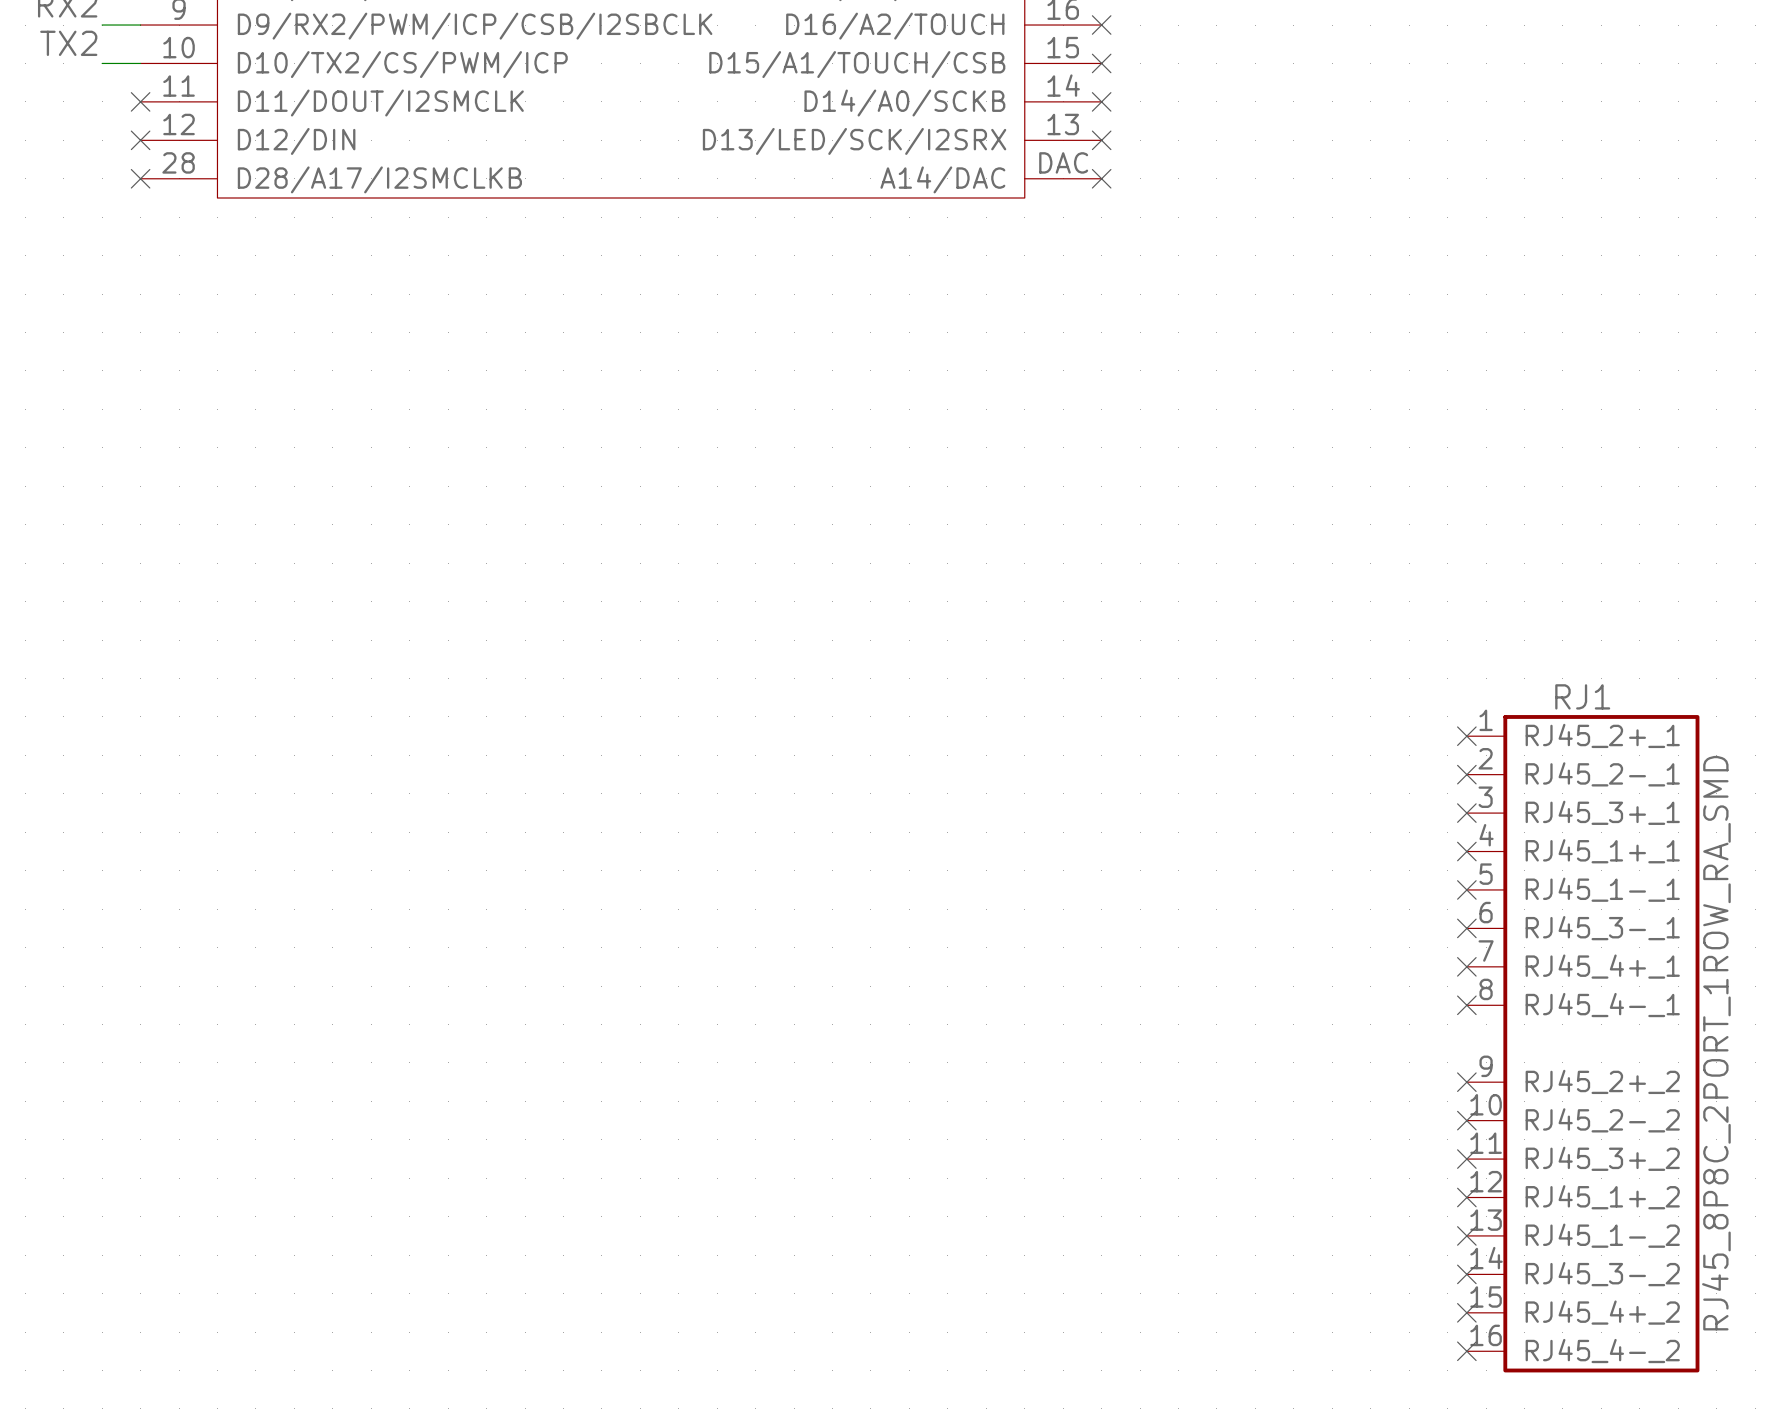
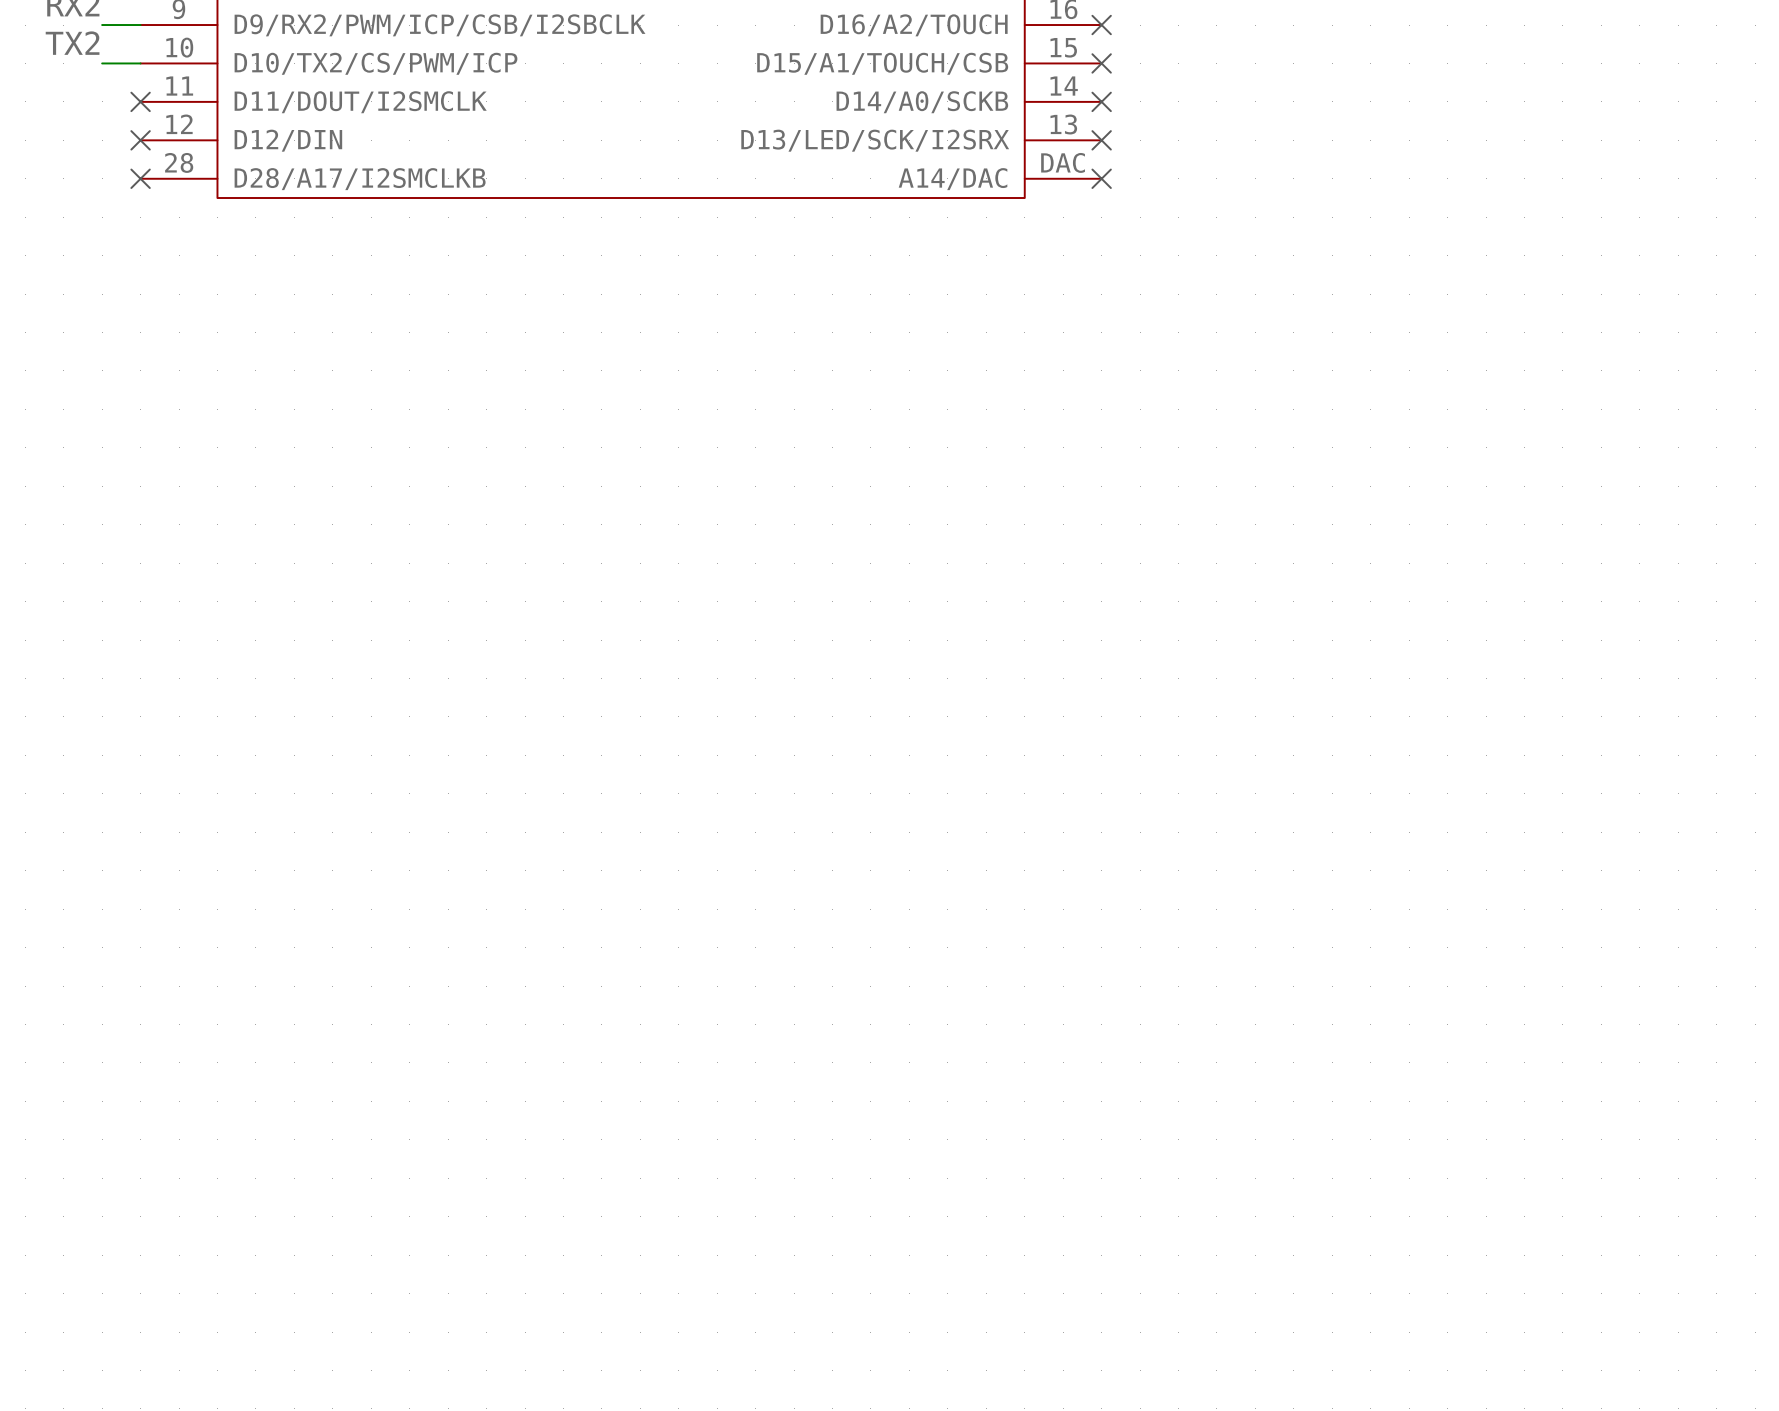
no-connect mark: (1466, 736) -> none
no-connect mark: (1466, 774) -> none
no-connect mark: (1466, 813) -> none
no-connect mark: (1466, 851) -> none
no-connect mark: (1466, 889) -> none
no-connect mark: (1466, 928) -> none
no-connect mark: (1466, 966) -> none
no-connect mark: (1466, 1005) -> none
RJ1: RJ45_8P8C_2PORT_1ROW_RA_SMD (1583, 1043) -> none
no-connect mark: (1466, 1082) -> none
no-connect mark: (1466, 1120) -> none
no-connect mark: (1466, 1159) -> none
no-connect mark: (1466, 1197) -> none
no-connect mark: (1466, 1235) -> none
no-connect mark: (1466, 1274) -> none
no-connect mark: (1466, 1312) -> none
no-connect mark: (1466, 1351) -> none

